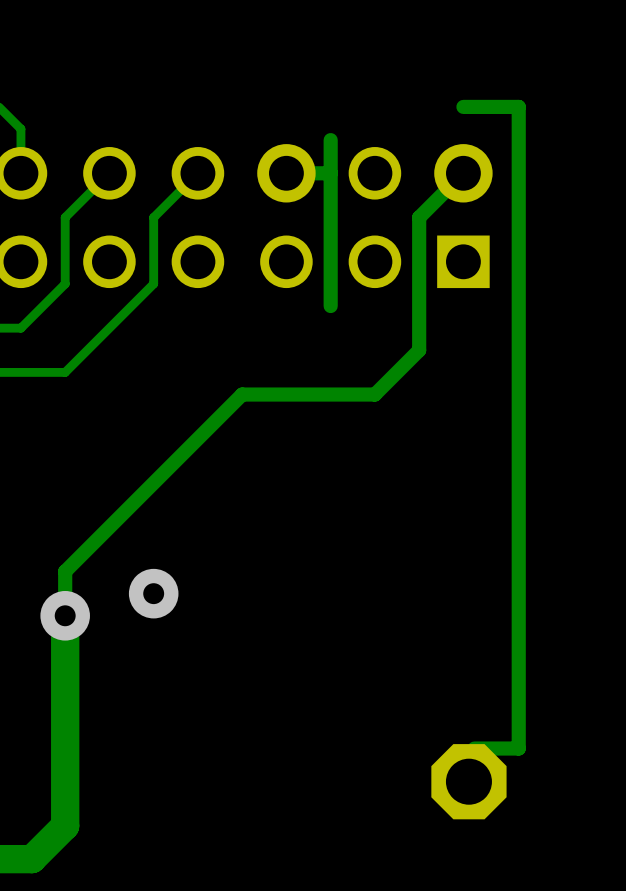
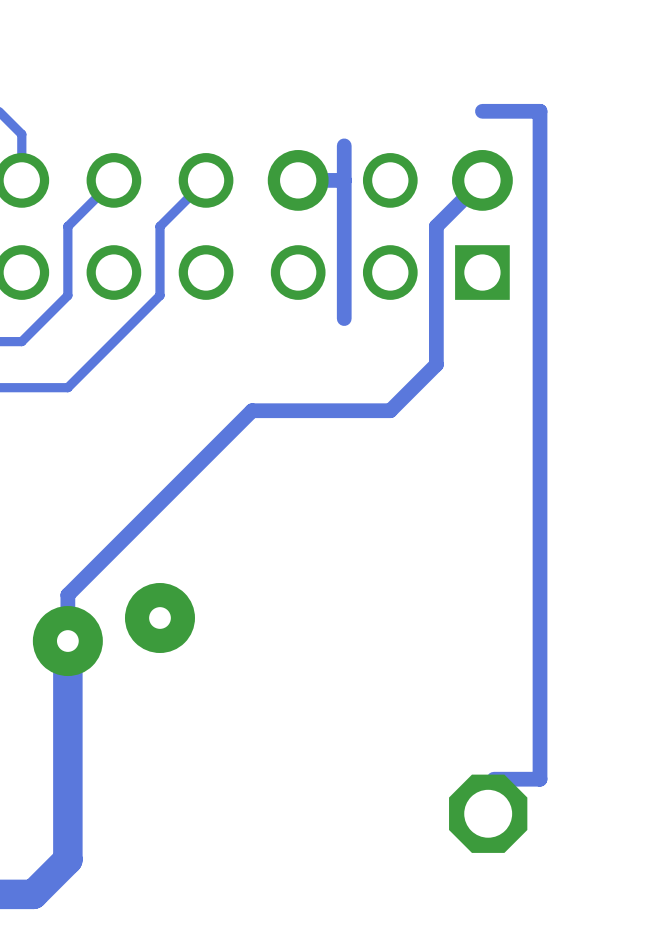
via size: [128, 568, 179, 619] -> [124, 582, 196, 654]
via size: [40, 591, 90, 641] -> [32, 606, 103, 677]

